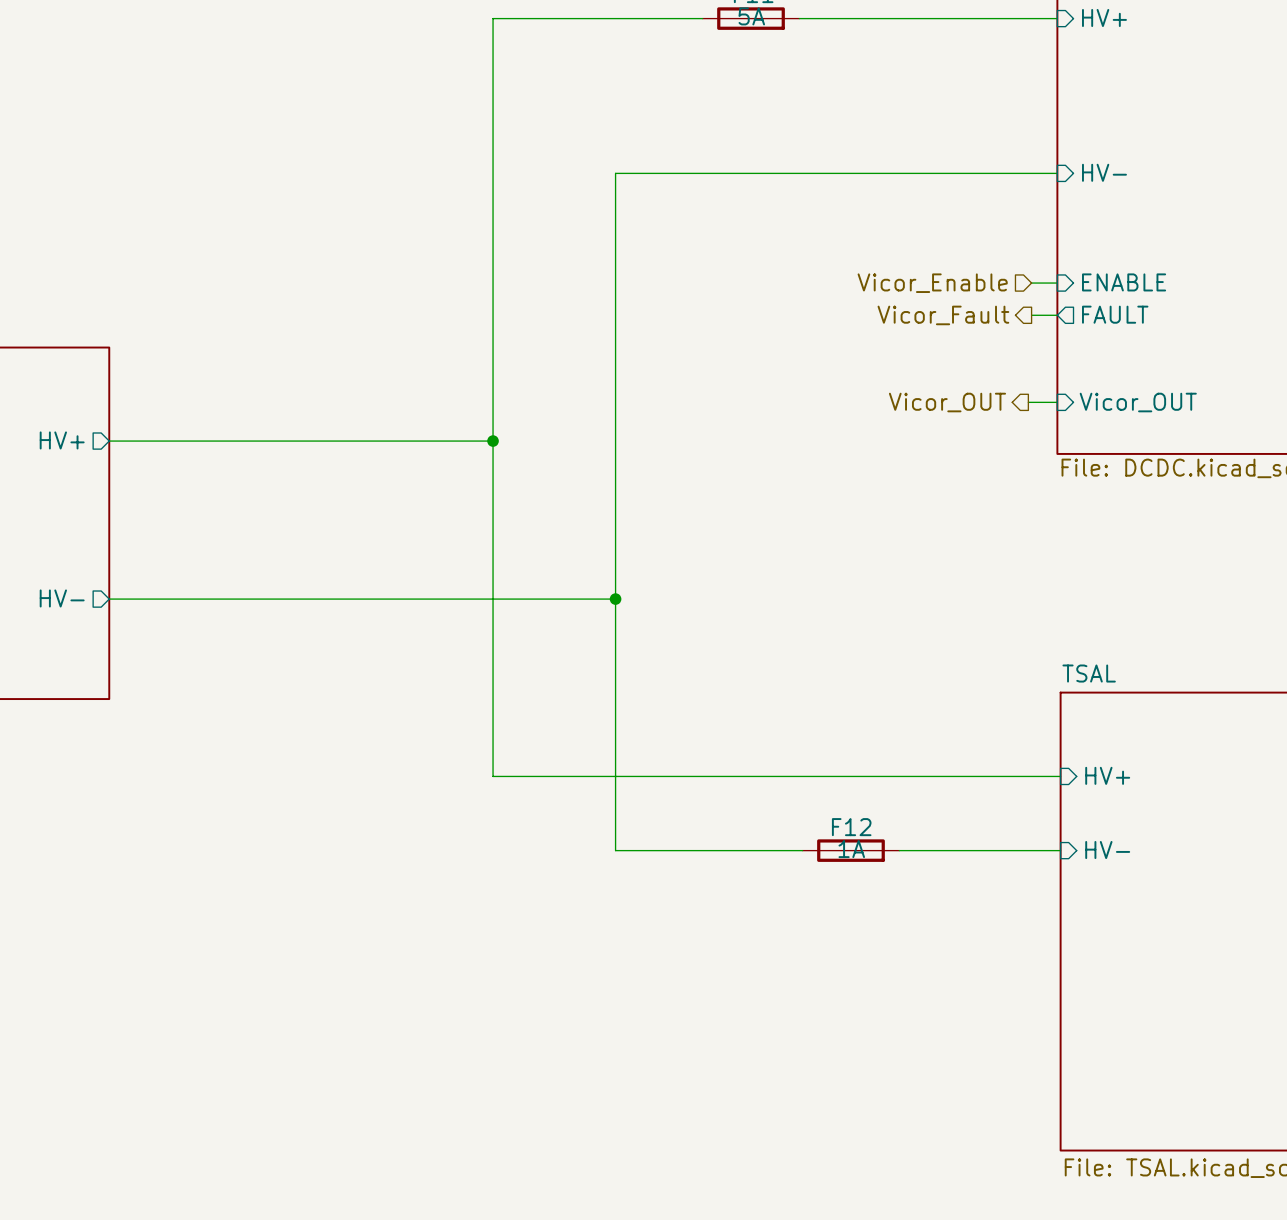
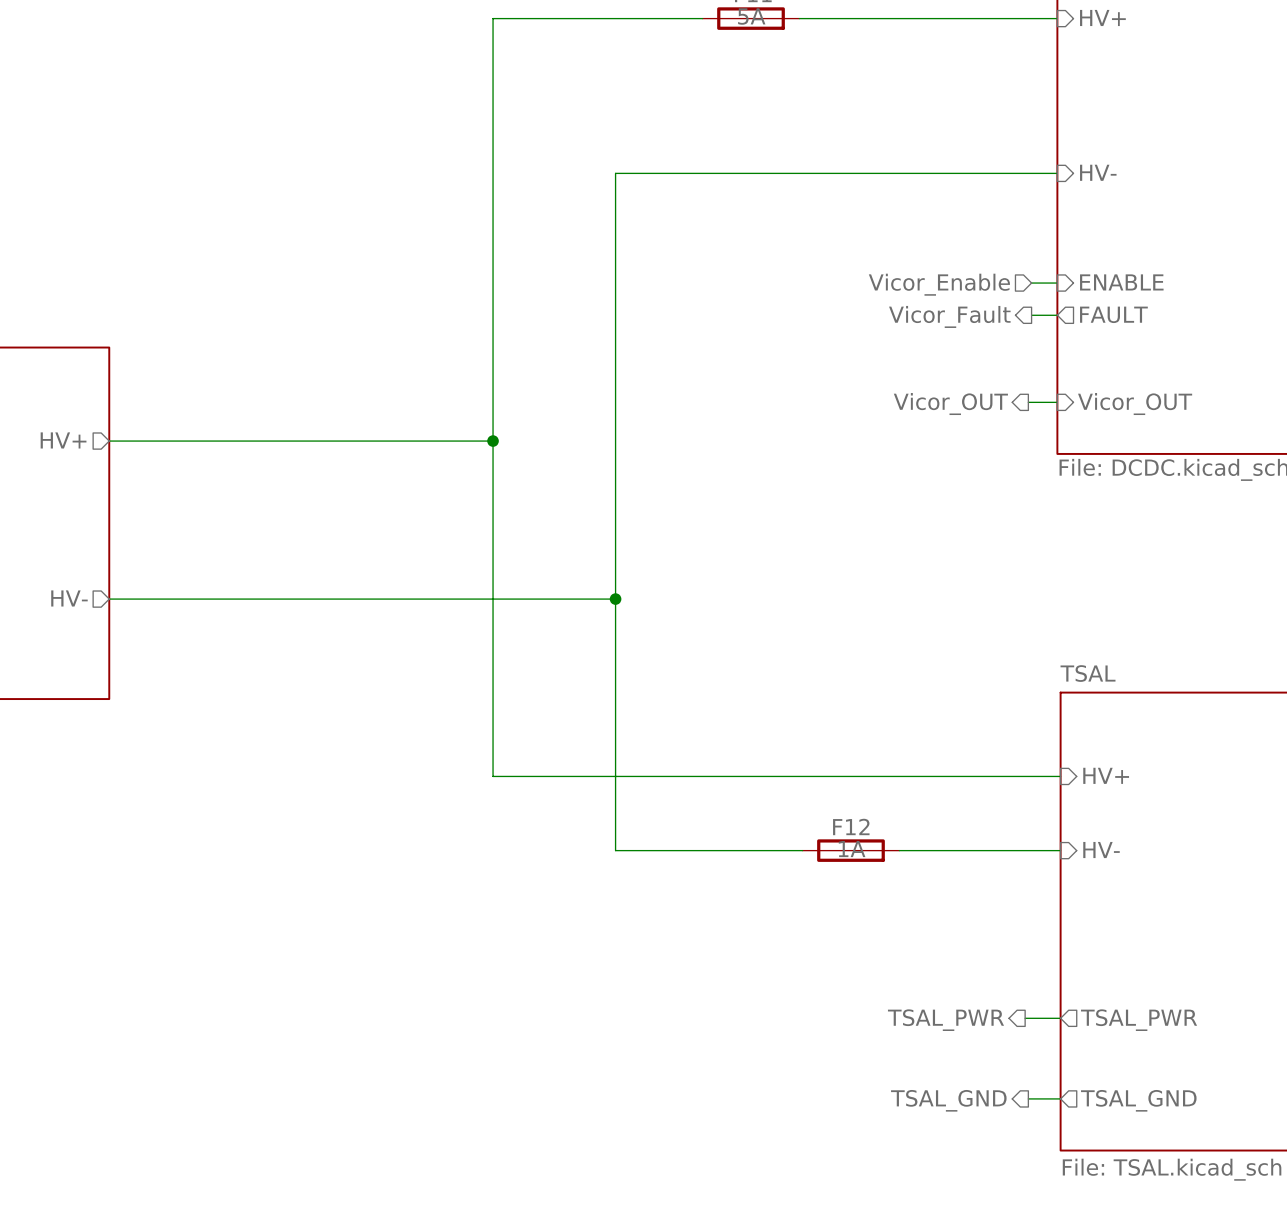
hierarchical label: none -> TSAL_PWR (945, 1020)
wire: none -> (1025, 1018) (1060, 1018)
sheet pin: none -> TSAL_PWR (1139, 1020)
wire: none -> (1028, 1098) (1060, 1098)
hierarchical label: none -> TSAL_GND (948, 1100)
sheet pin: none -> TSAL_GND (1138, 1100)

